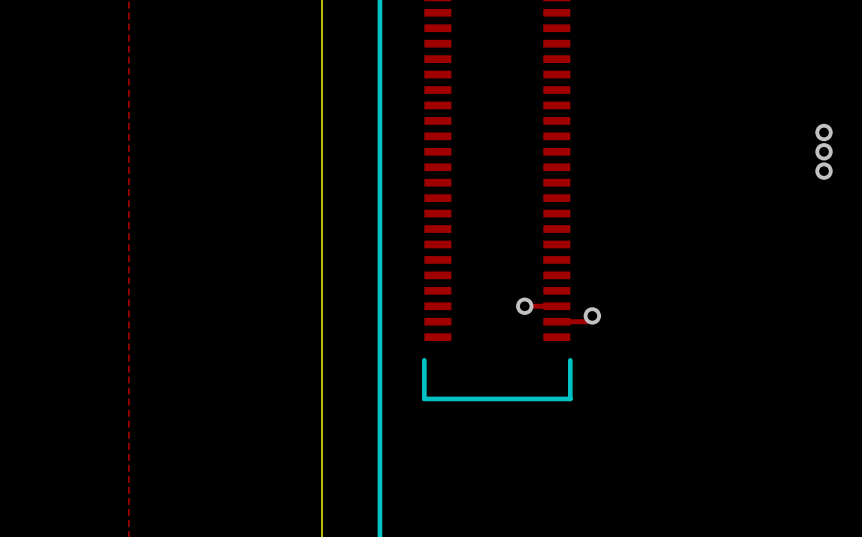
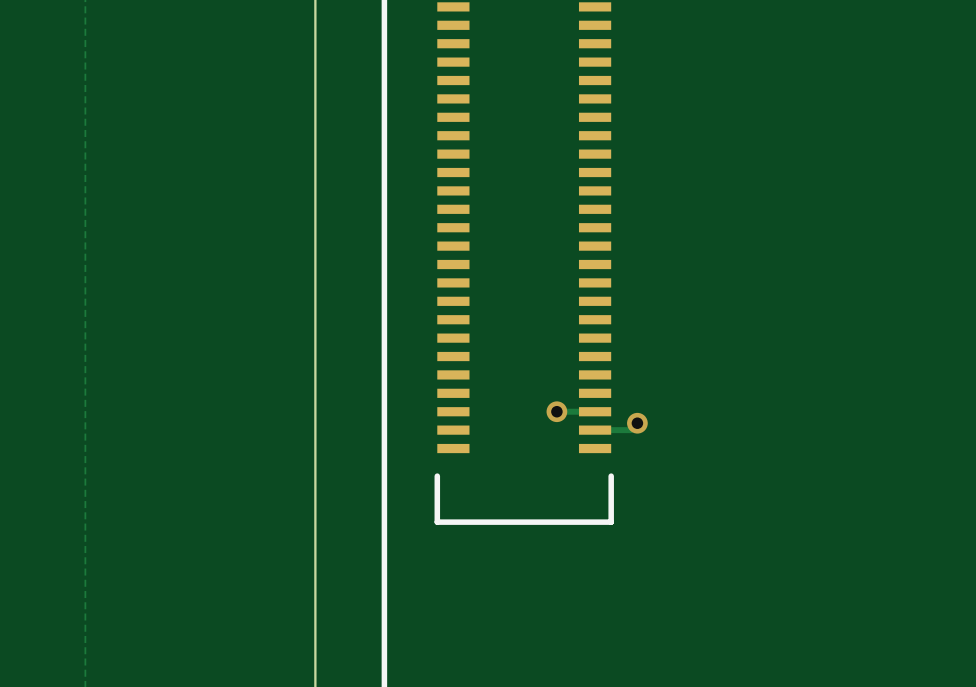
via: (824, 132) -> none
via: (824, 151) -> none
via: (824, 171) -> none

